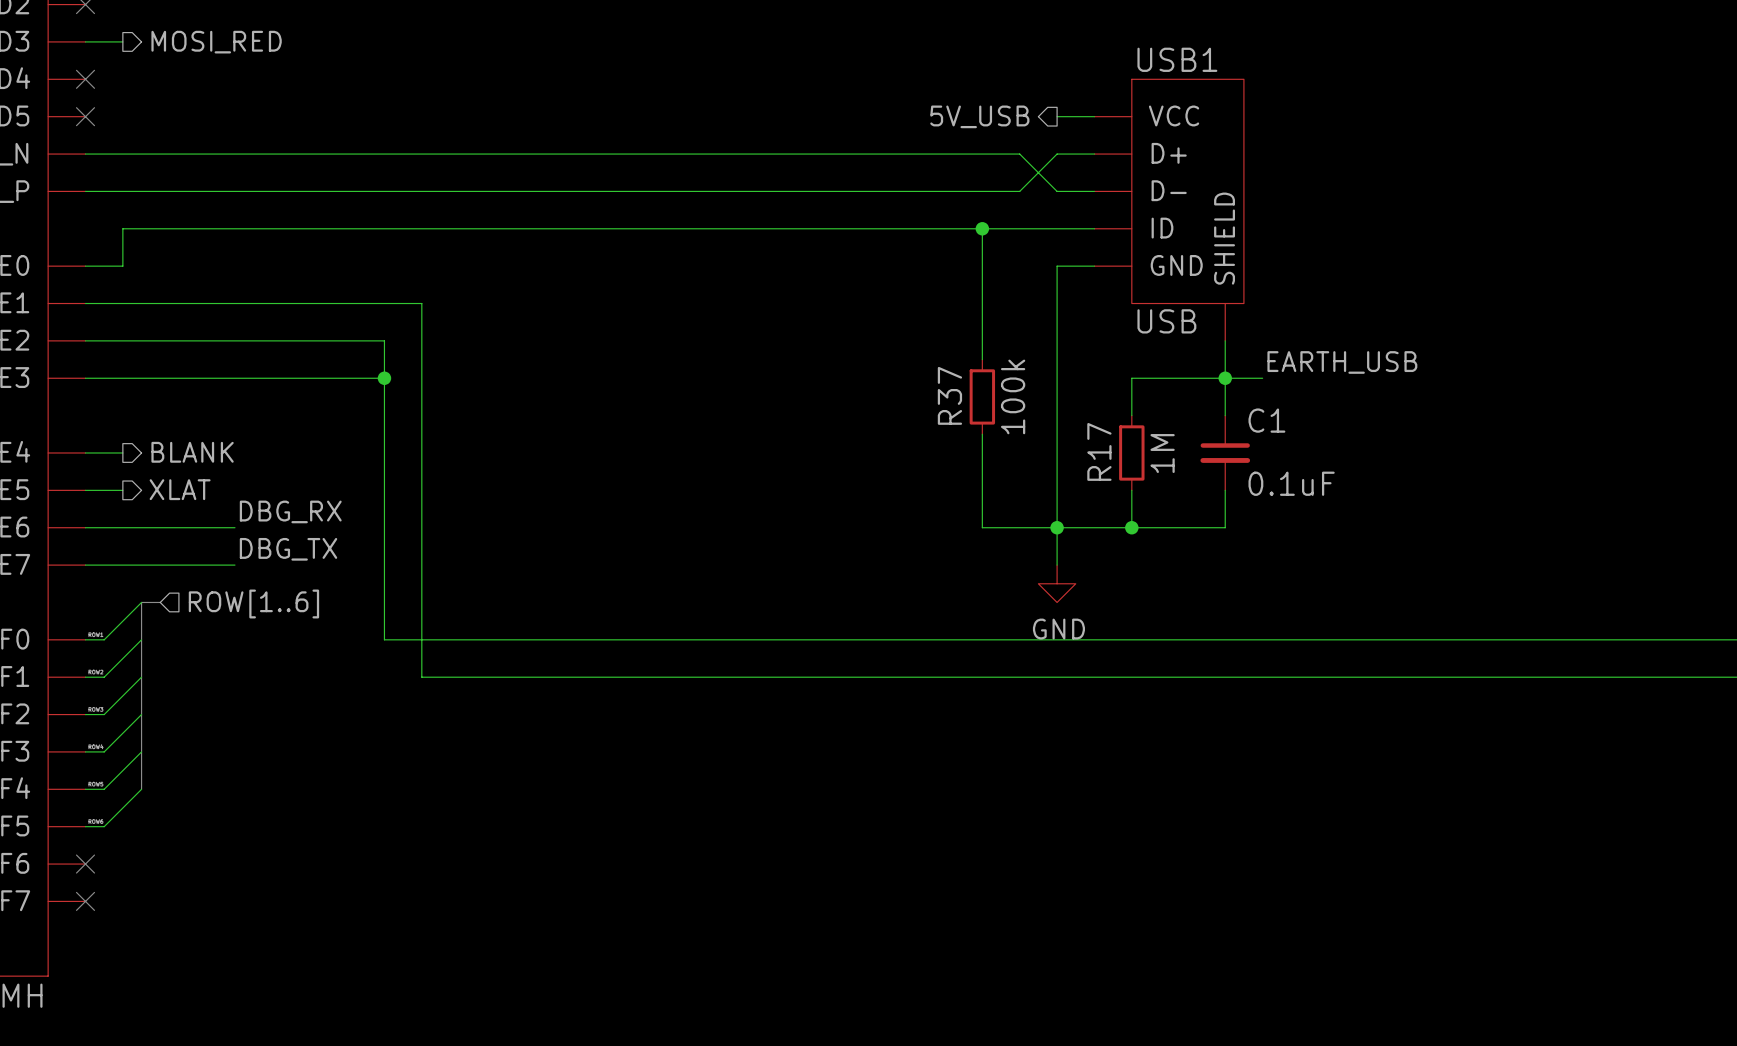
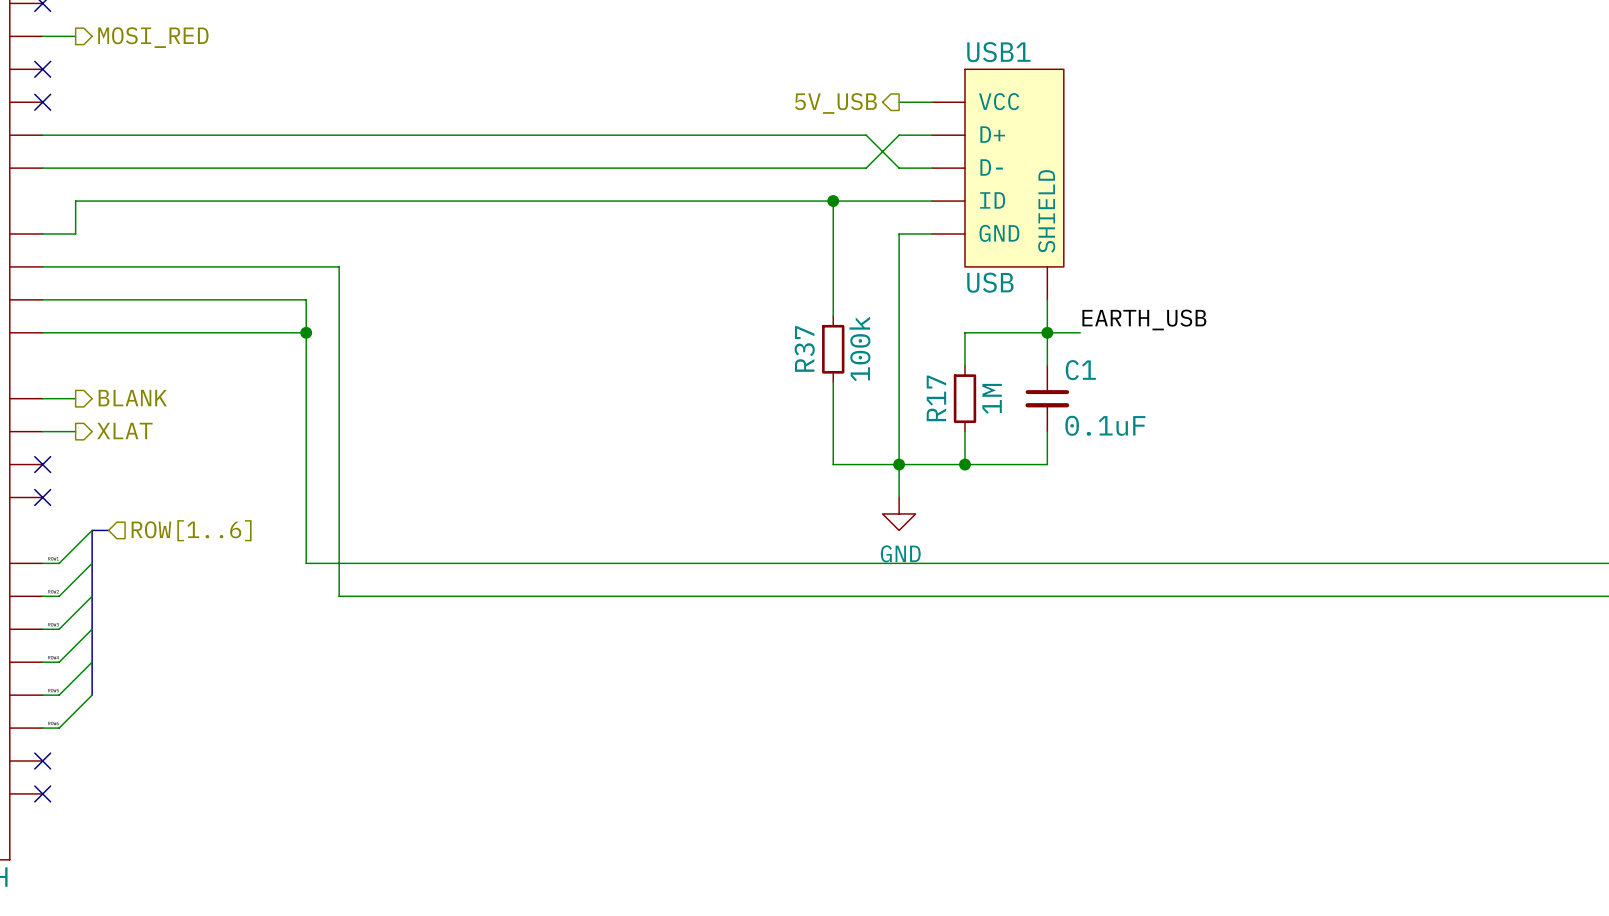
label: DBG_RX (290, 511) -> none
wire: (85, 527) (234, 527) -> none
no-connect mark: none -> (42, 464)
label: DBG_TX (288, 549) -> none
wire: (85, 565) (234, 565) -> none
no-connect mark: none -> (42, 497)

